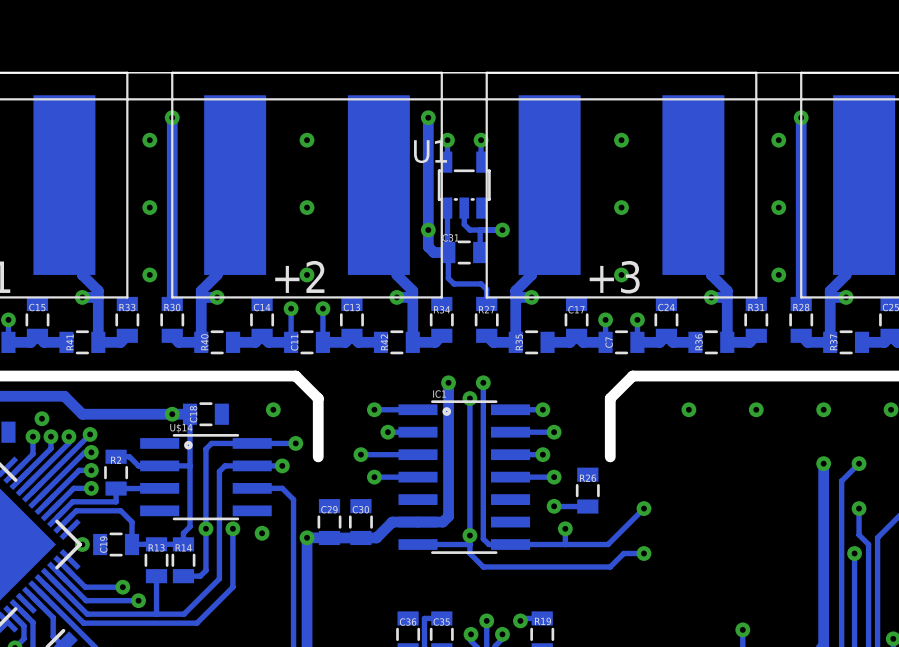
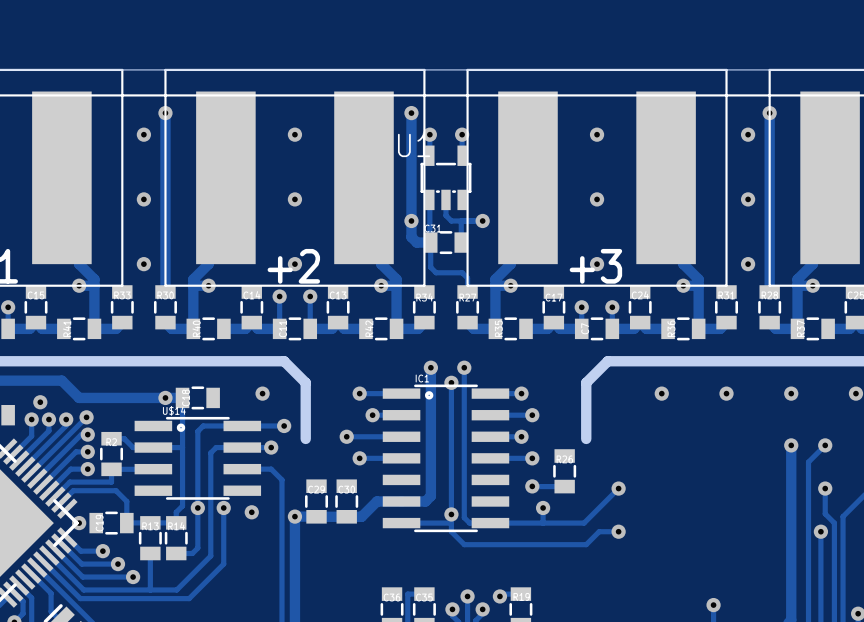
track: none -> (67, 537) (80, 551) (102, 551)
via: none -> (102, 551)

